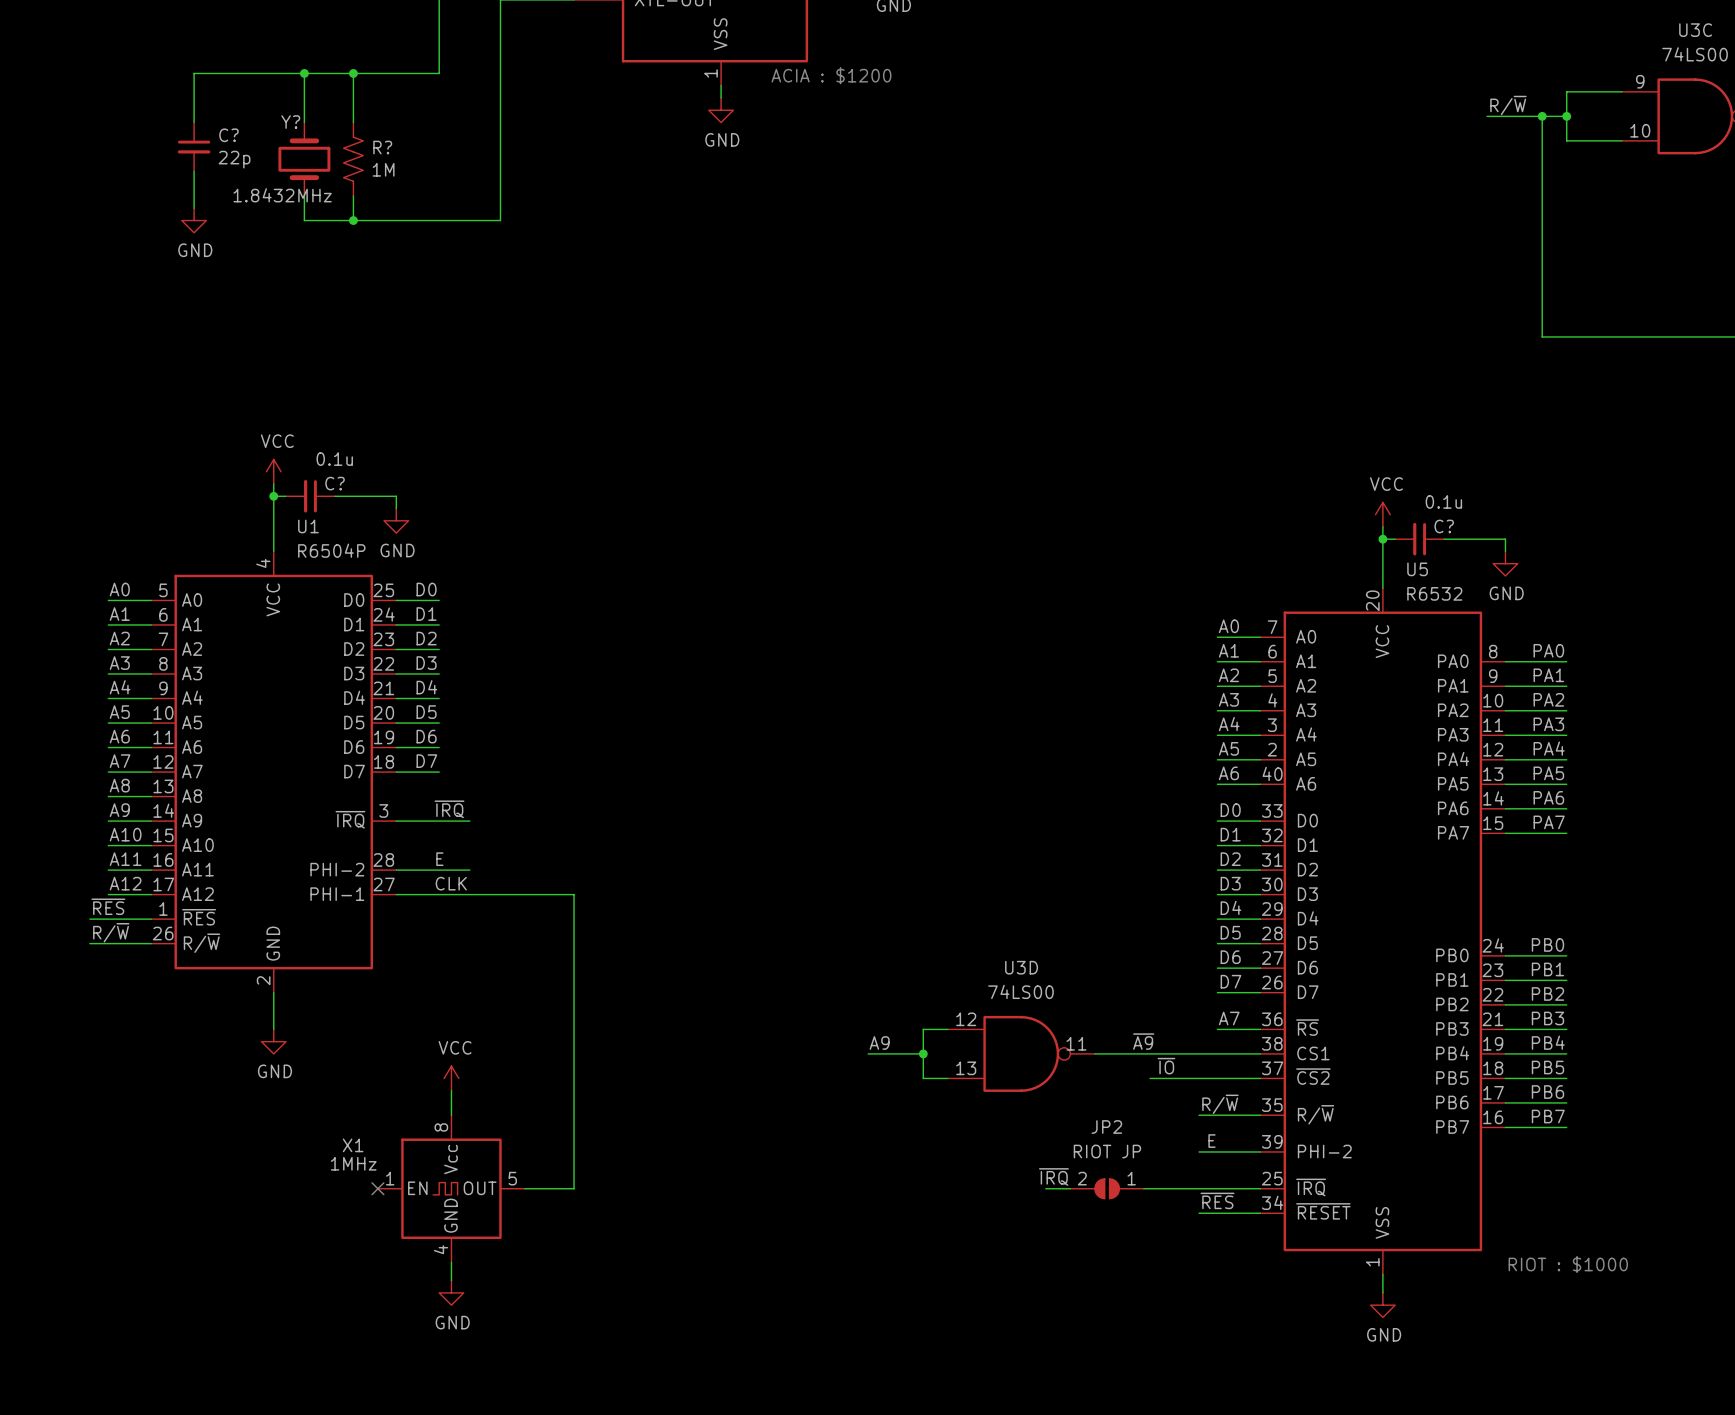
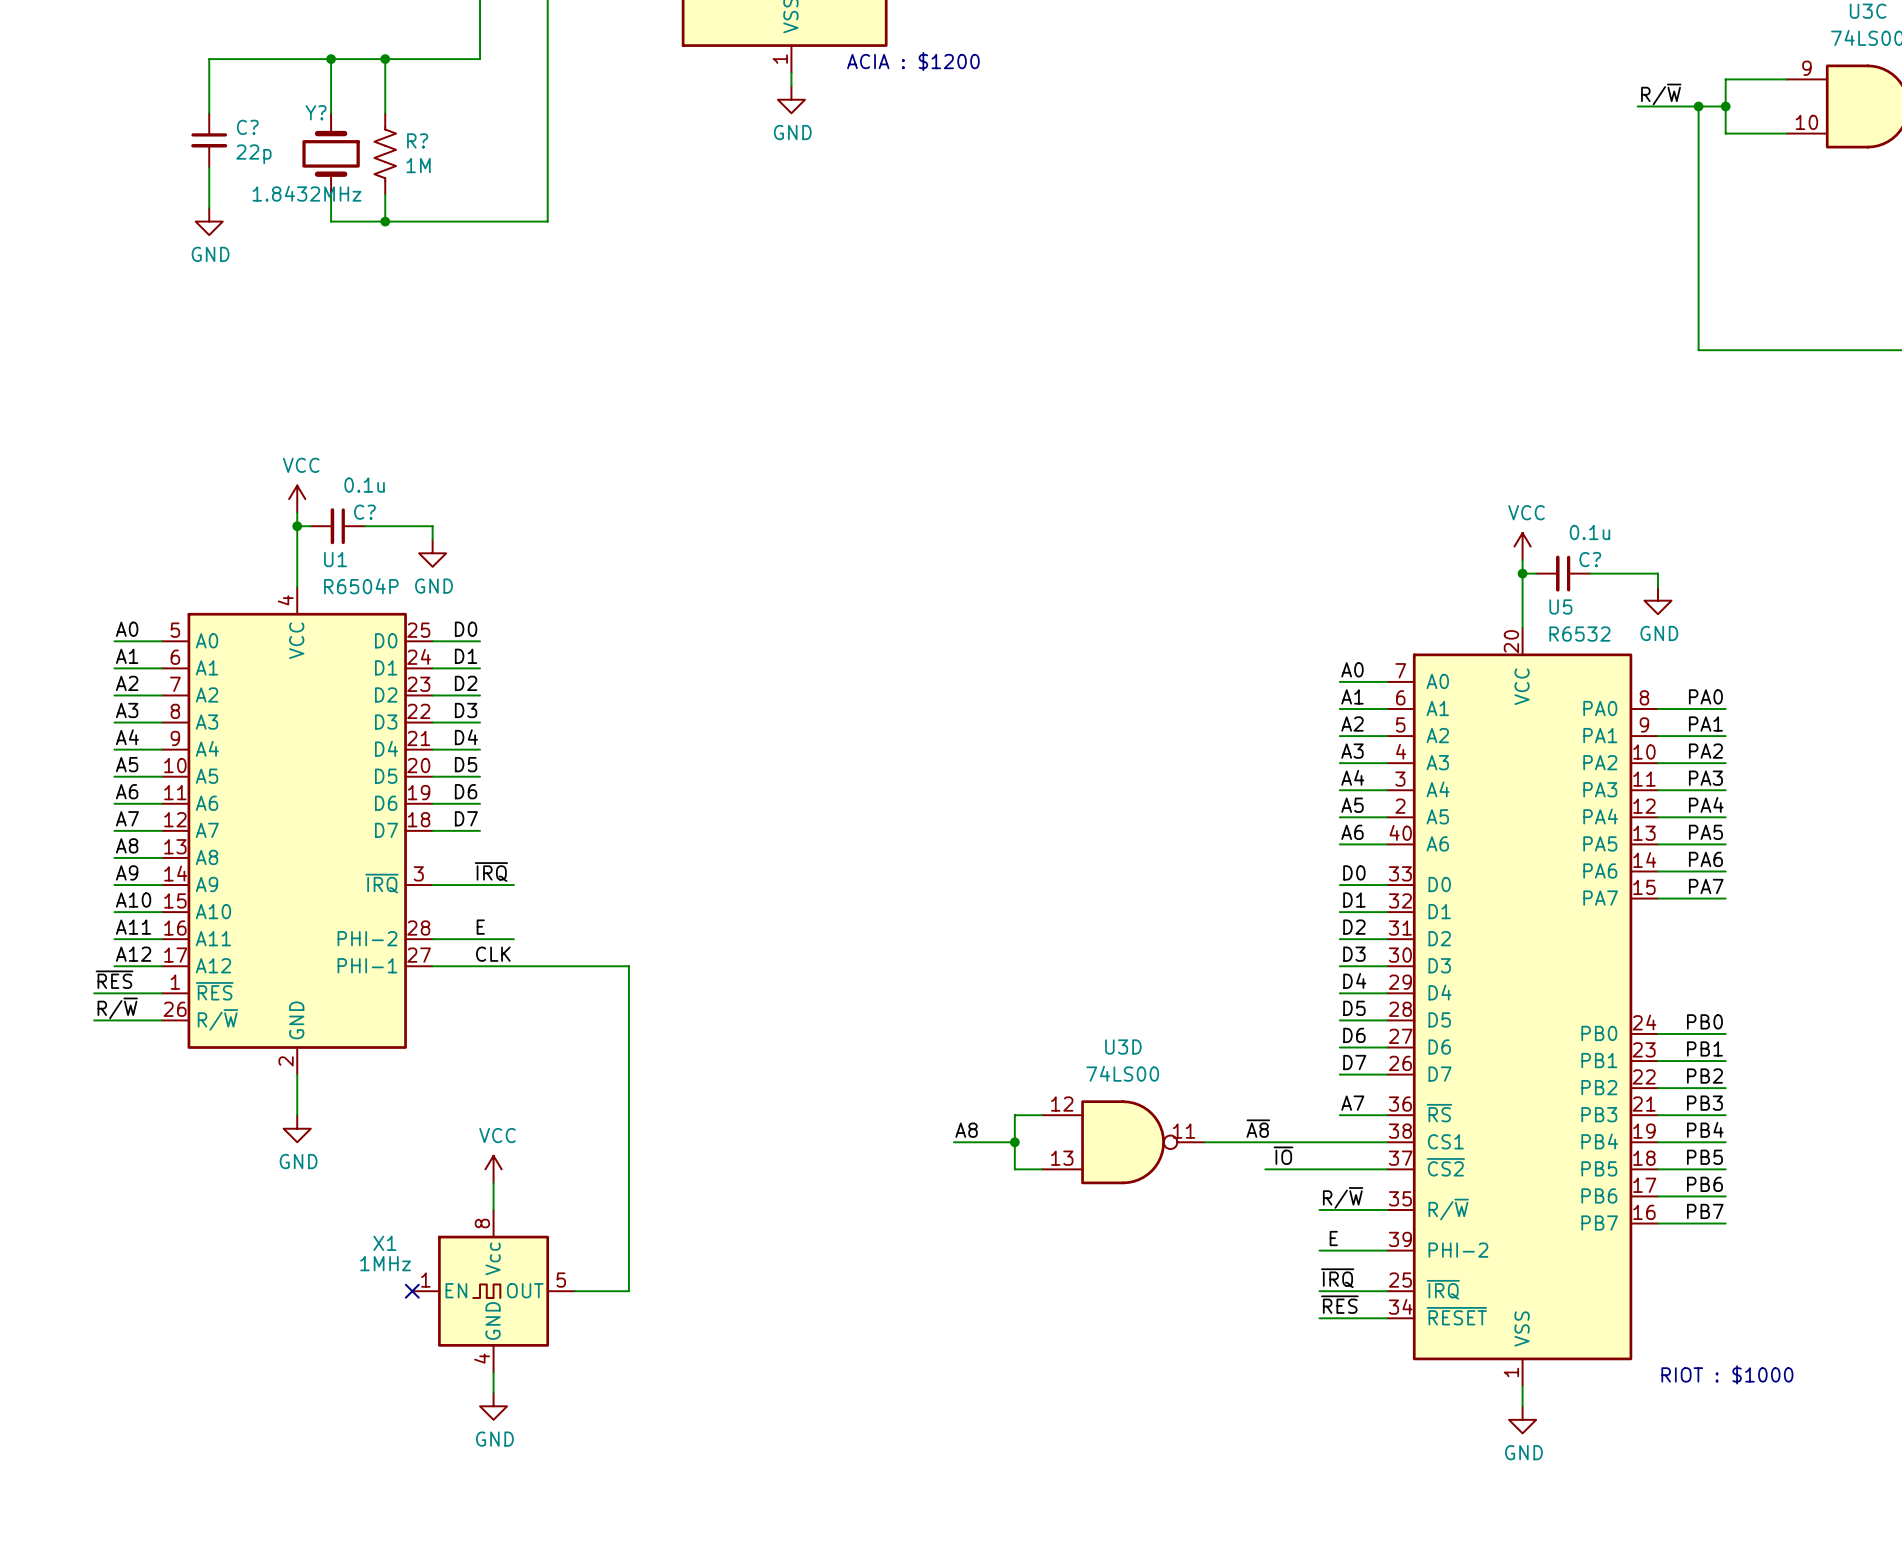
label: ~{A9} (1143, 1041) -> ~{A8} (1258, 1128)
label: A9 (879, 1042) -> A8 (966, 1130)
label position: ~{IRQ} (1053, 1176) -> ~{IRQ} (1337, 1278)
wire: (1045, 1188) (1070, 1188) -> none
JP2: RIOT JP (1107, 1188) -> none
wire: (1143, 1188) (1199, 1188) -> none

